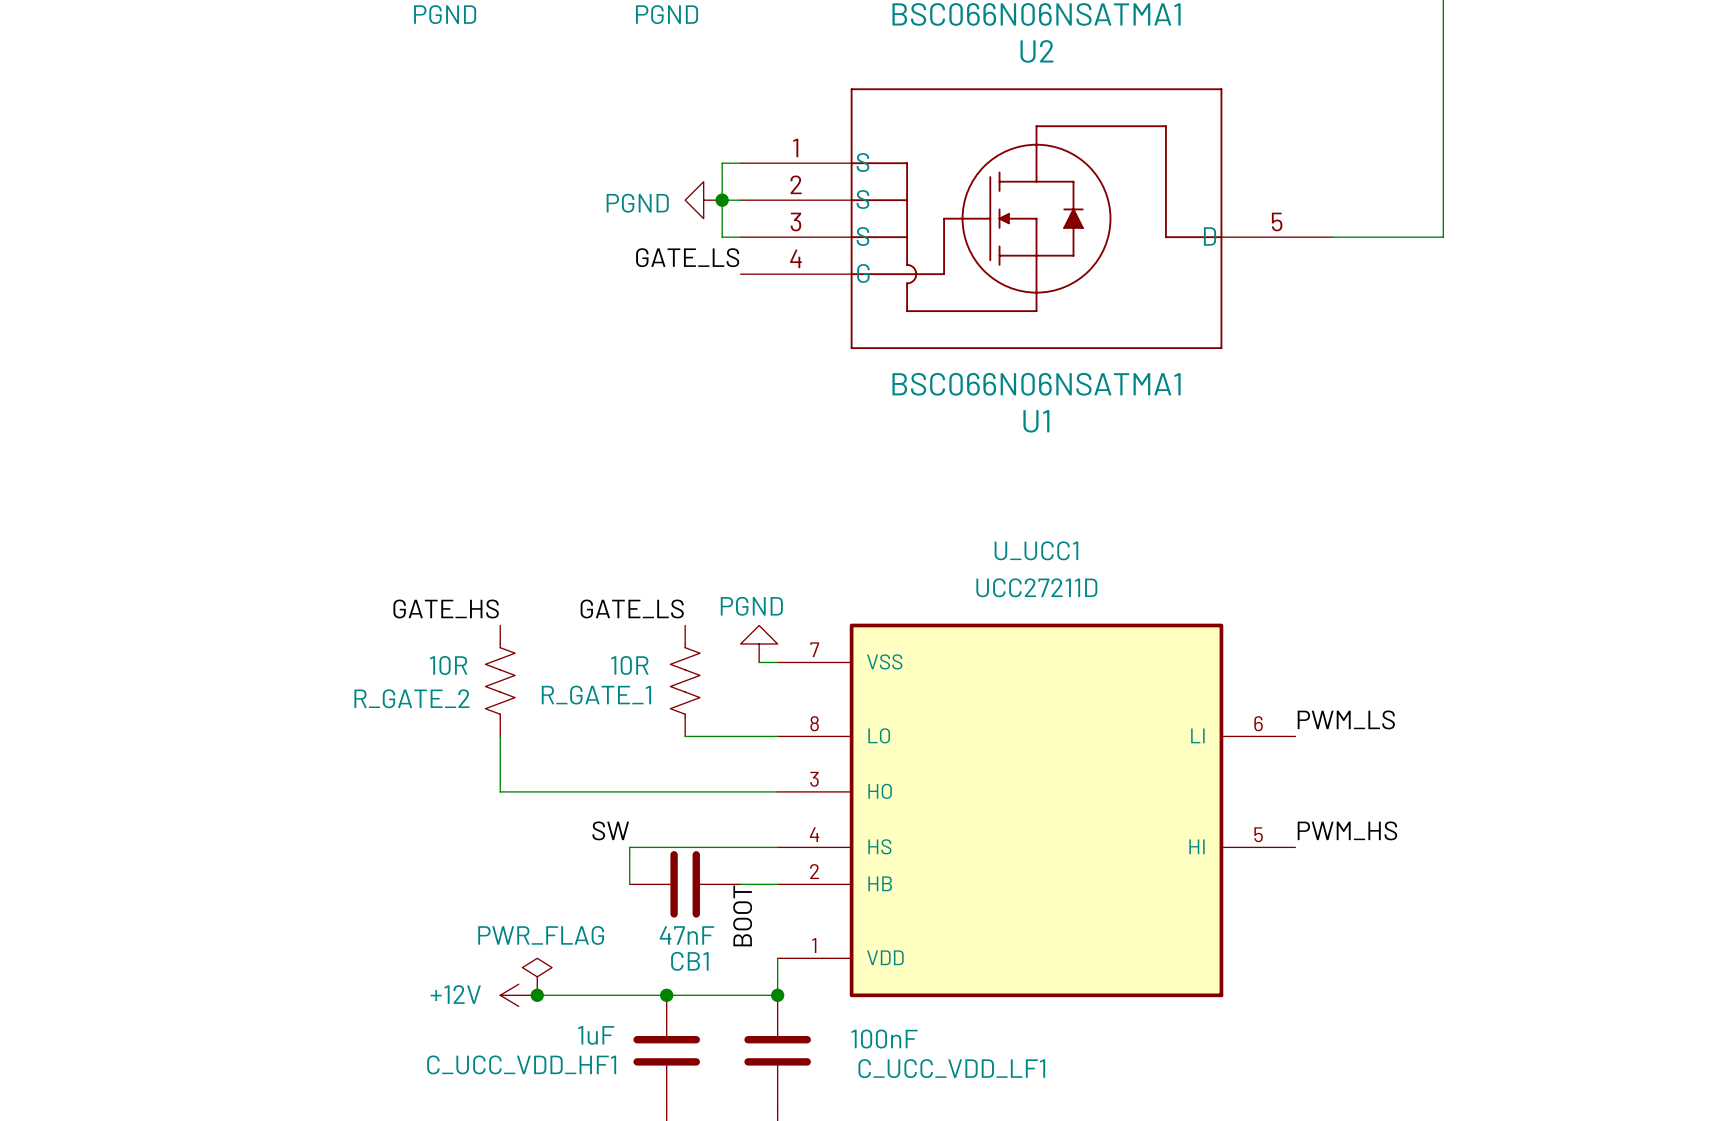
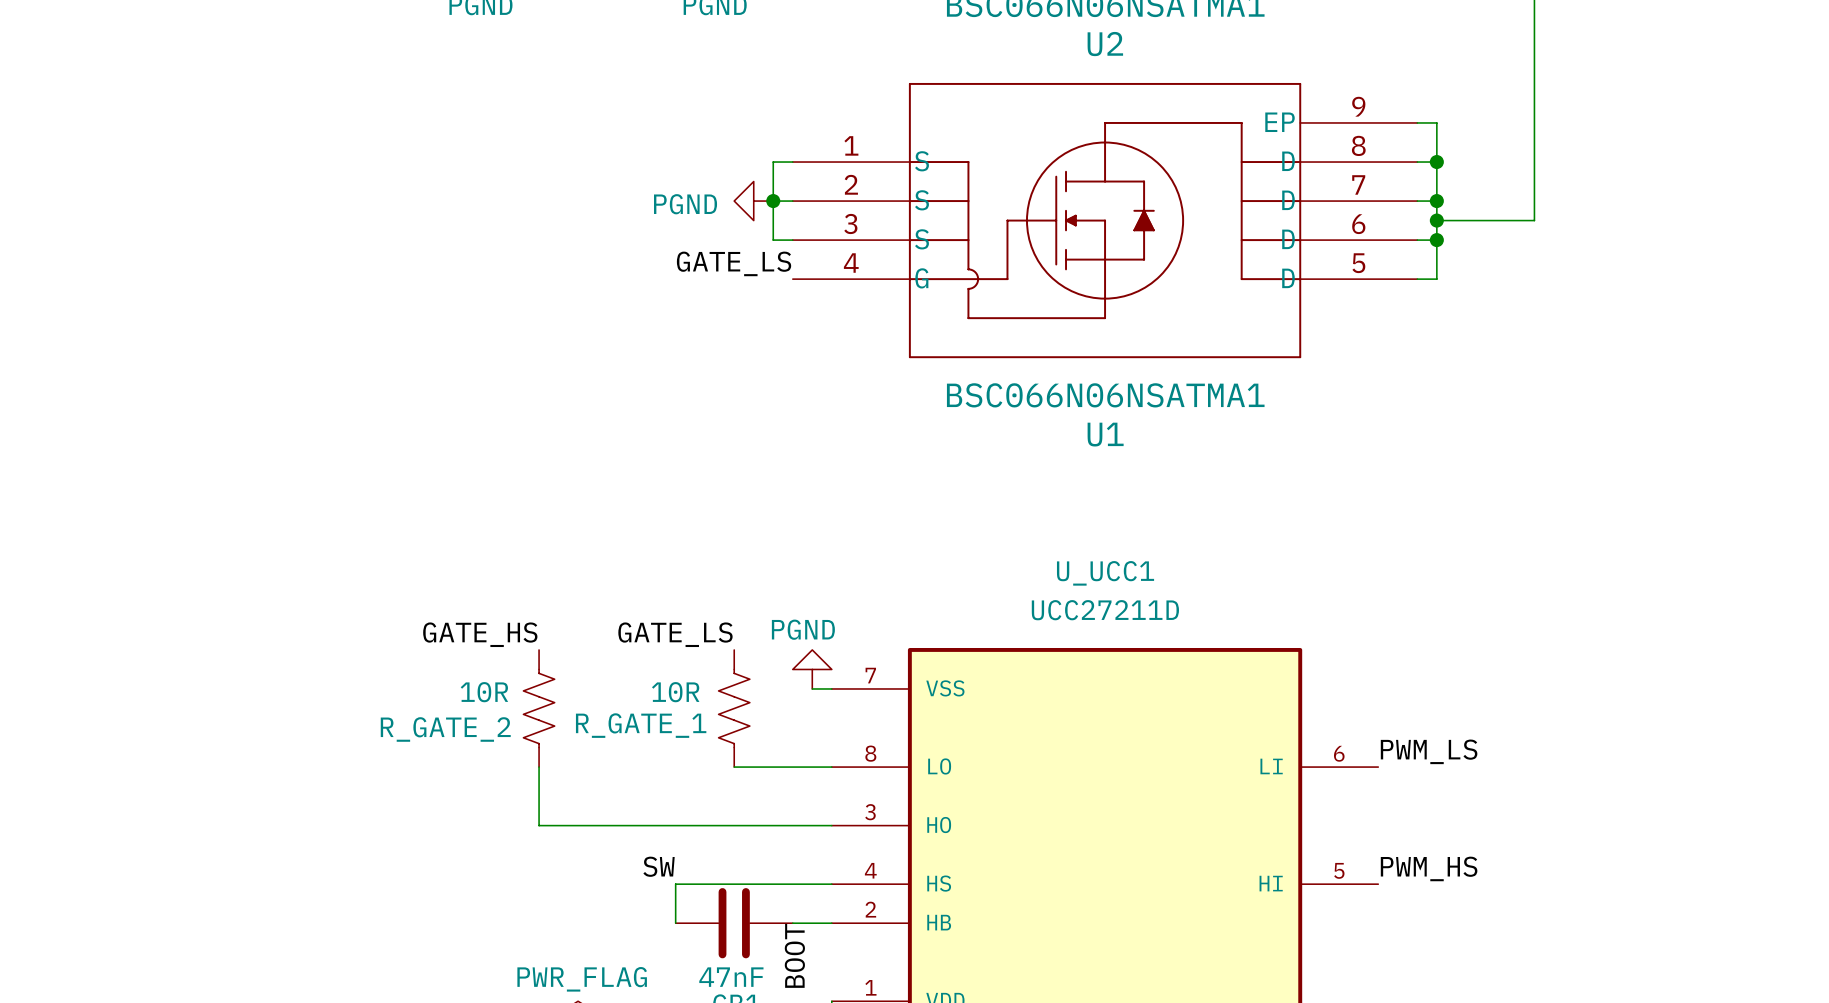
U1 symbol: [740, 88, 1333, 350] -> [792, 82, 1418, 359]
wire: none -> (1417, 122) (1436, 122) (1436, 279) (1417, 279)
wire: none -> (1417, 162) (1436, 162)
junction: none -> (1436, 162)
wire: none -> (1417, 201) (1436, 201)
junction: none -> (1436, 201)
junction: none -> (1436, 220)
wire: (1443, 218) (1443, 237) (1350, 237) -> (1534, 220) (1436, 220)
junction: none -> (1436, 240)

